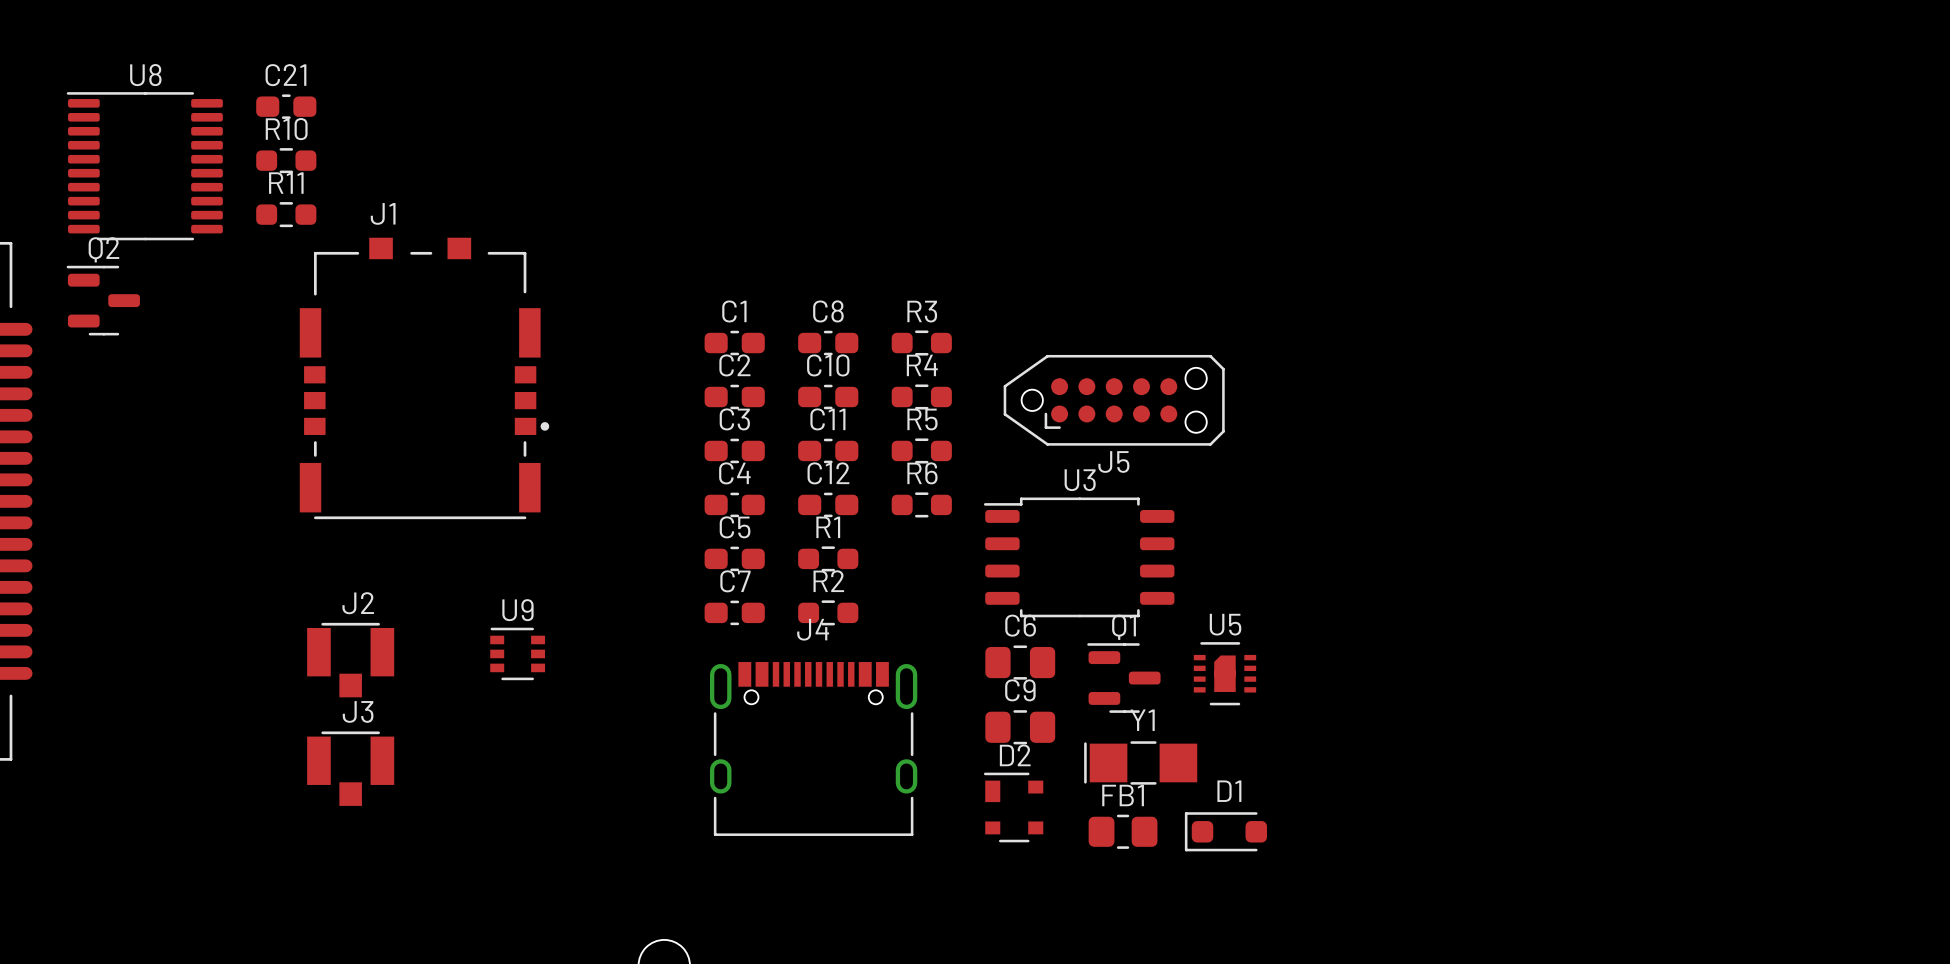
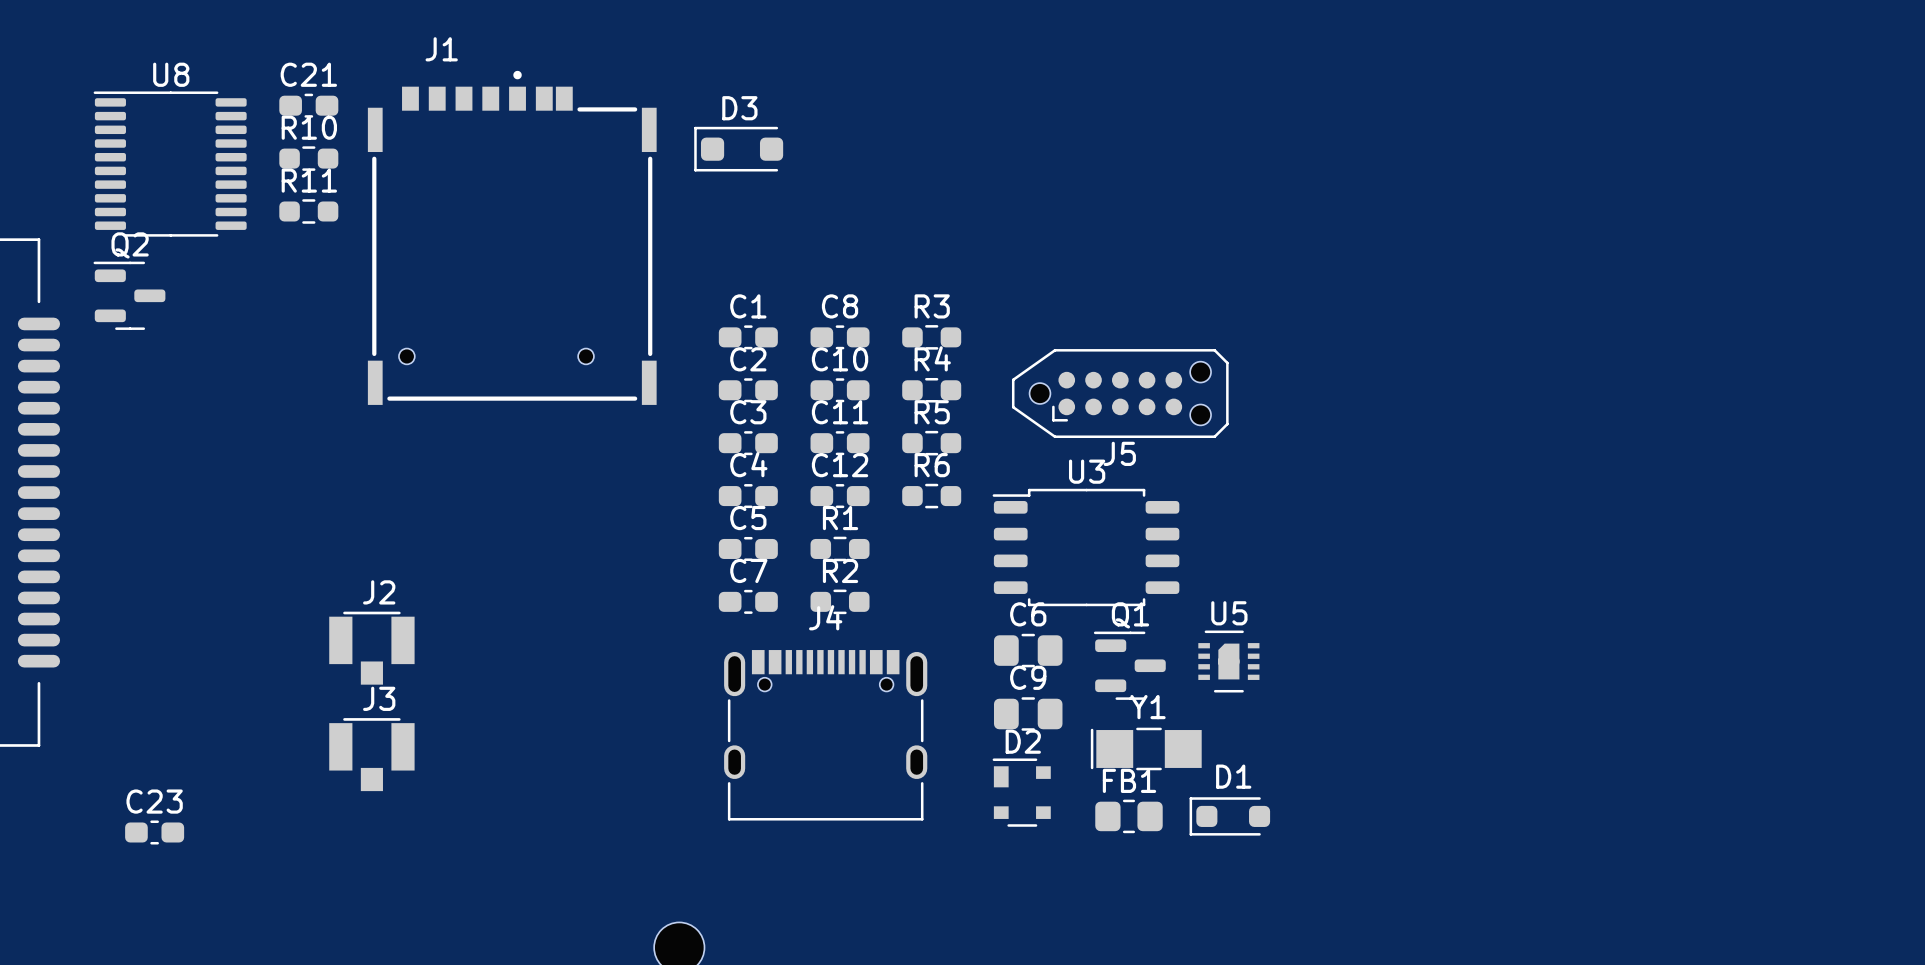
D3: none -> (738, 149)
J1 footprint: [299, 237, 550, 520] -> [367, 70, 657, 405]
U9: (517, 653) -> none
C23: none -> (154, 832)

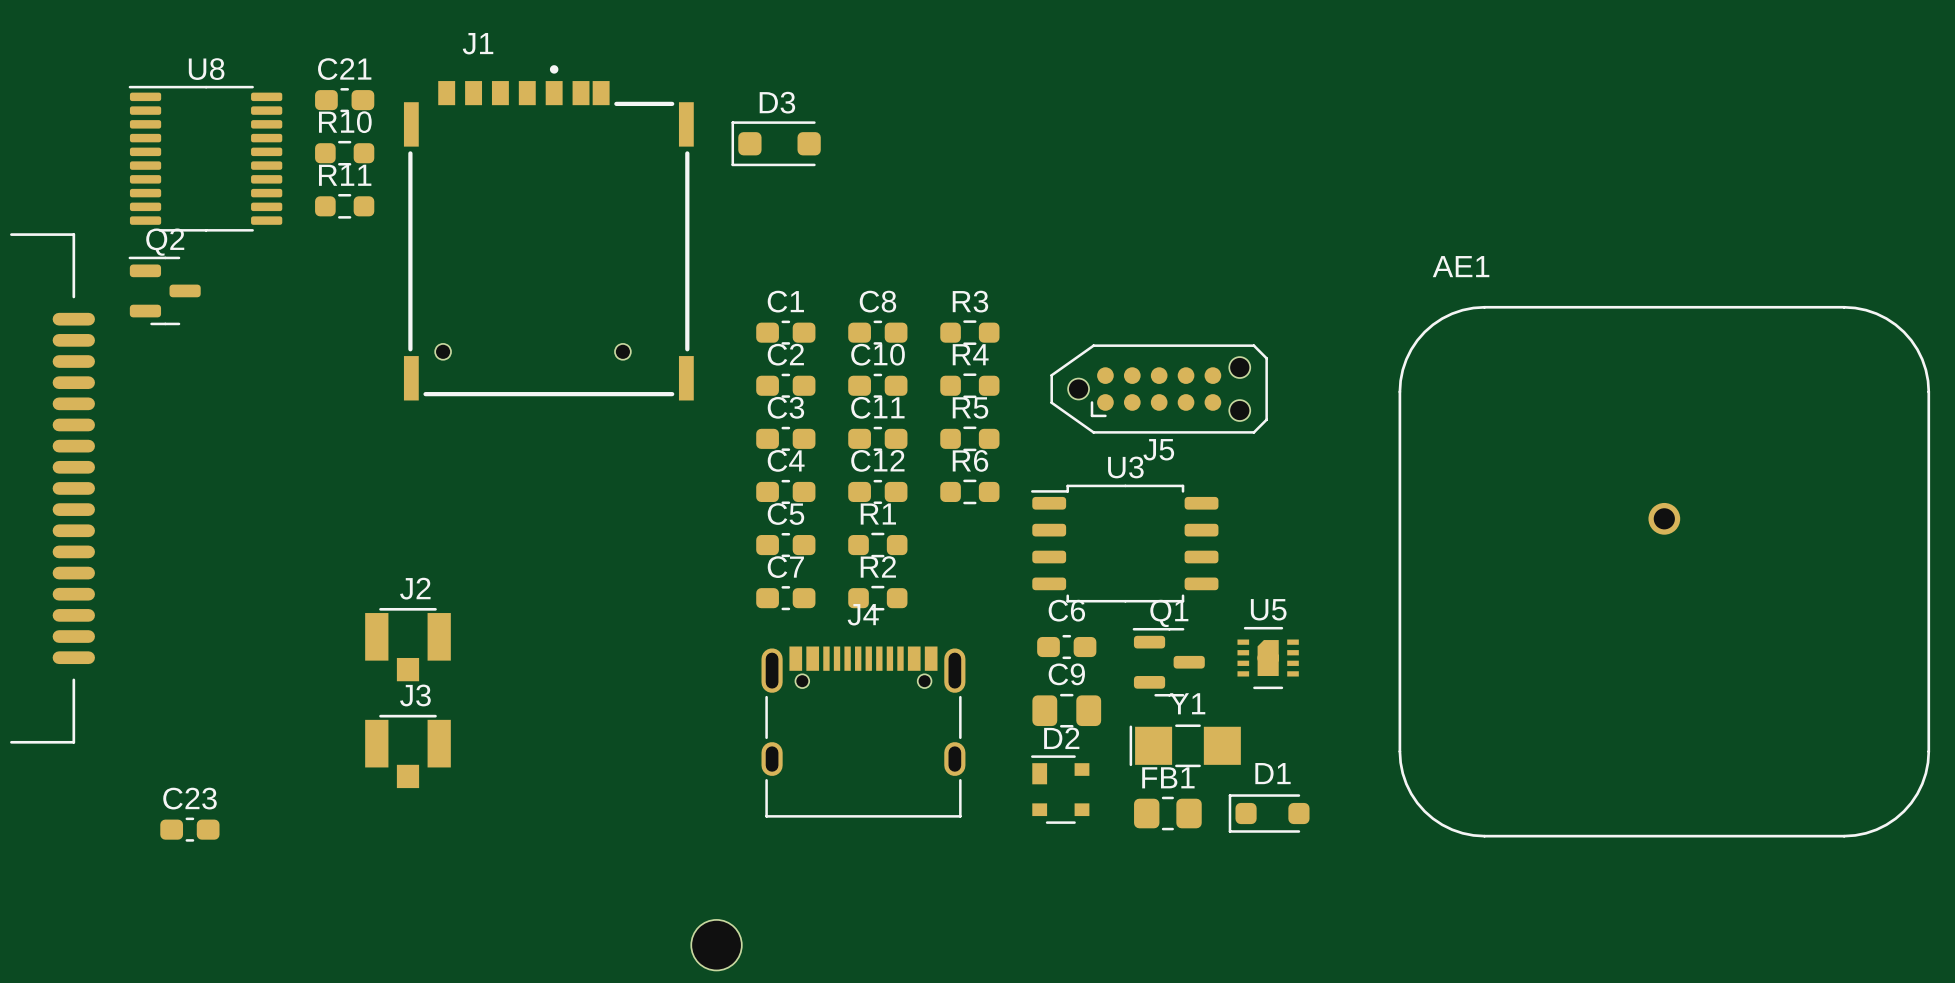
AE1: none -> (1664, 571)
C6 footprint: [993, 633, 1063, 668] -> [1037, 634, 1097, 660]

